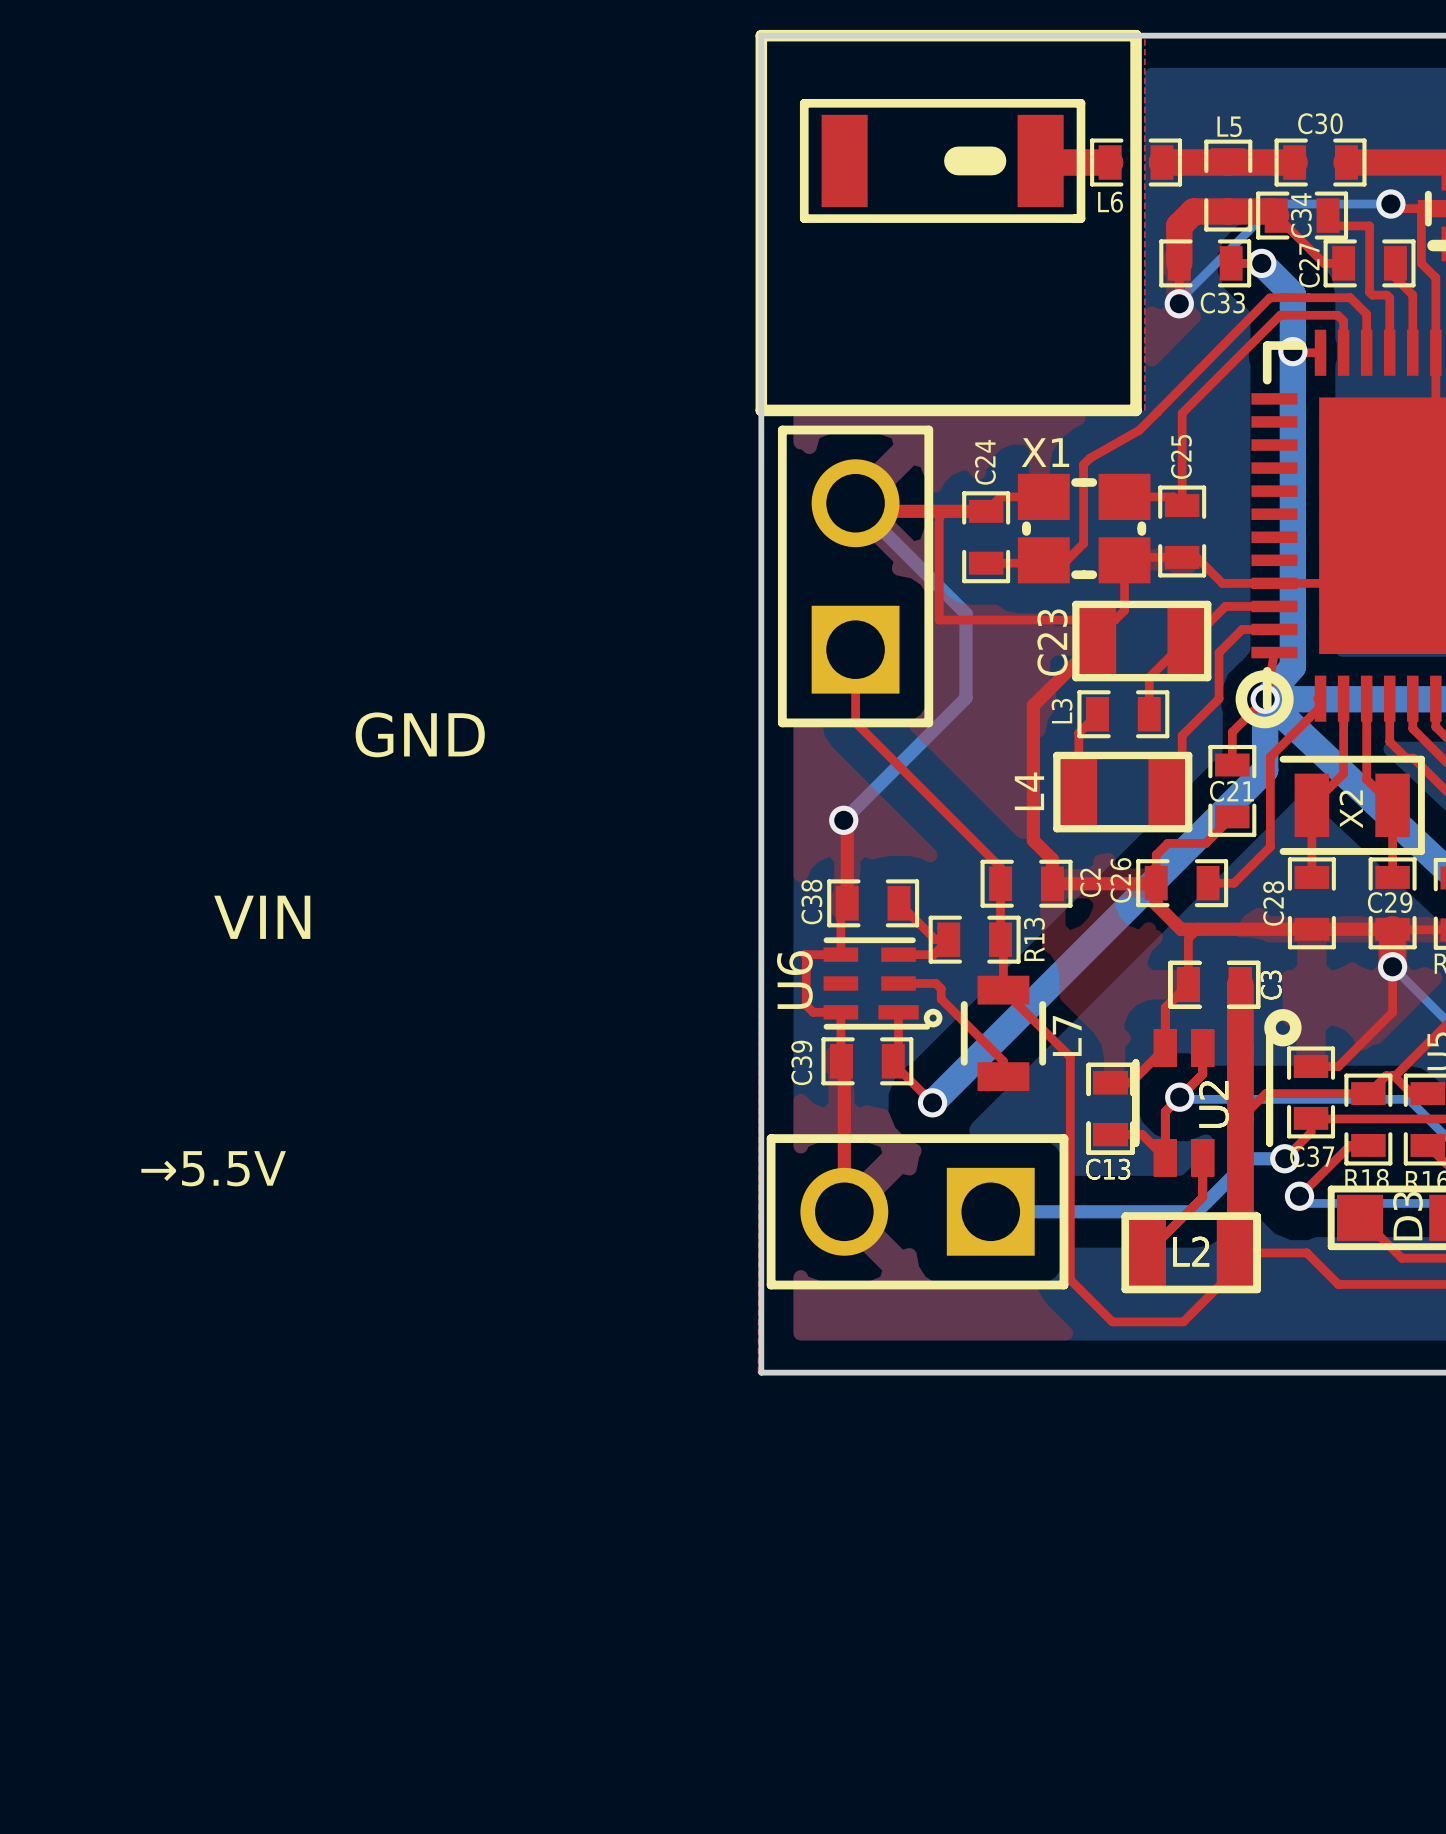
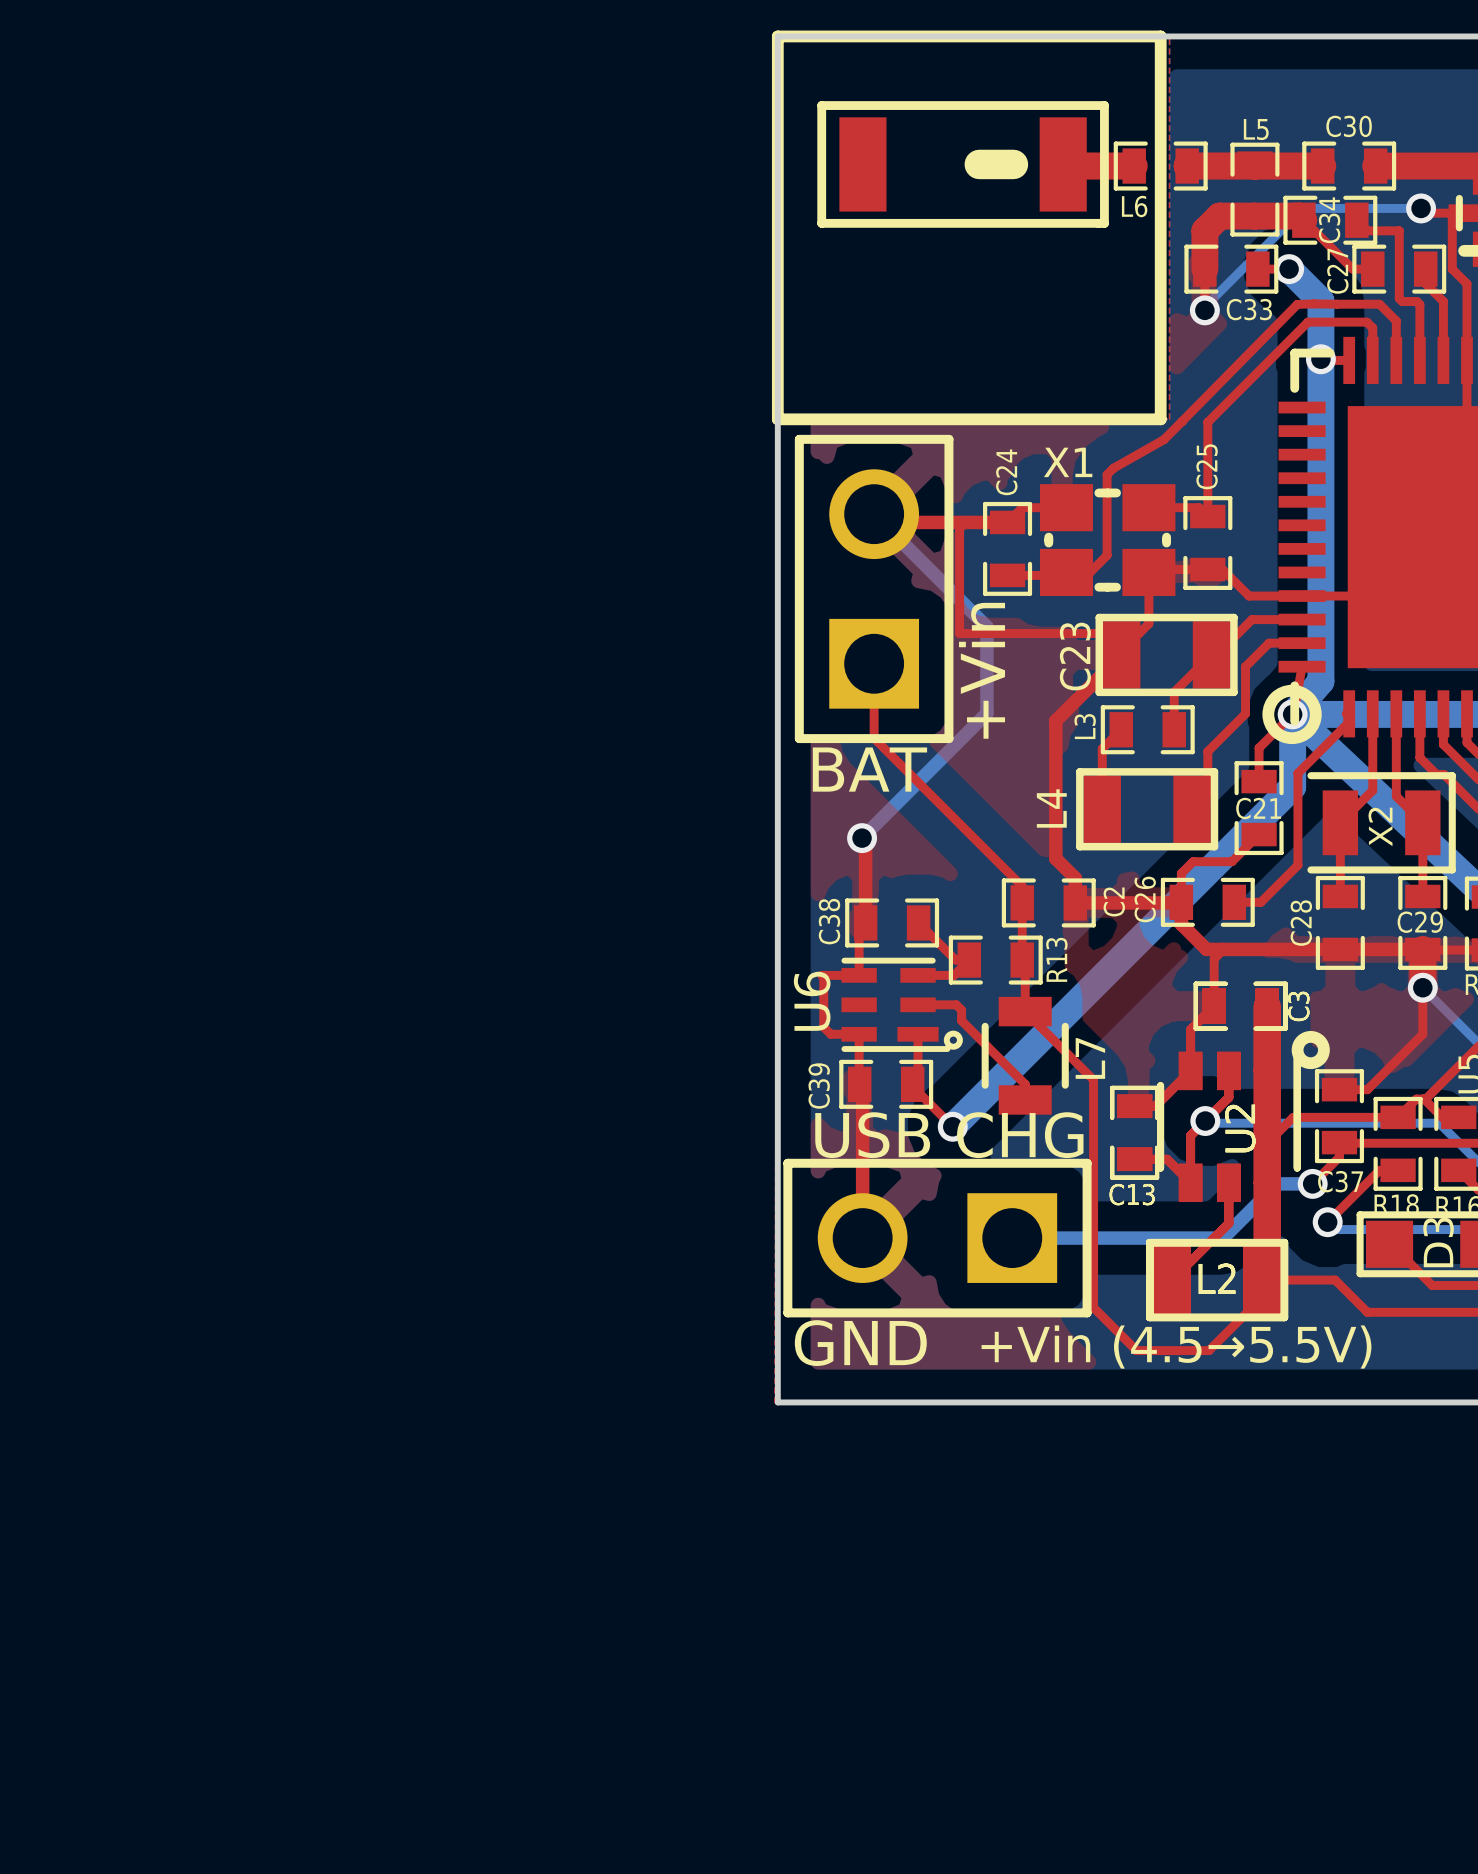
text: none -> +Vin (982, 670)
text position: GND (420, 734) -> GND (860, 1343)
text: none -> BAT (869, 769)
text: VIN (262, 917) -> none
text: none -> USB CHG (949, 1135)
text: →5.5V (213, 1168) -> none
text: none -> +Vin (4.5→5.5V) (1176, 1347)

